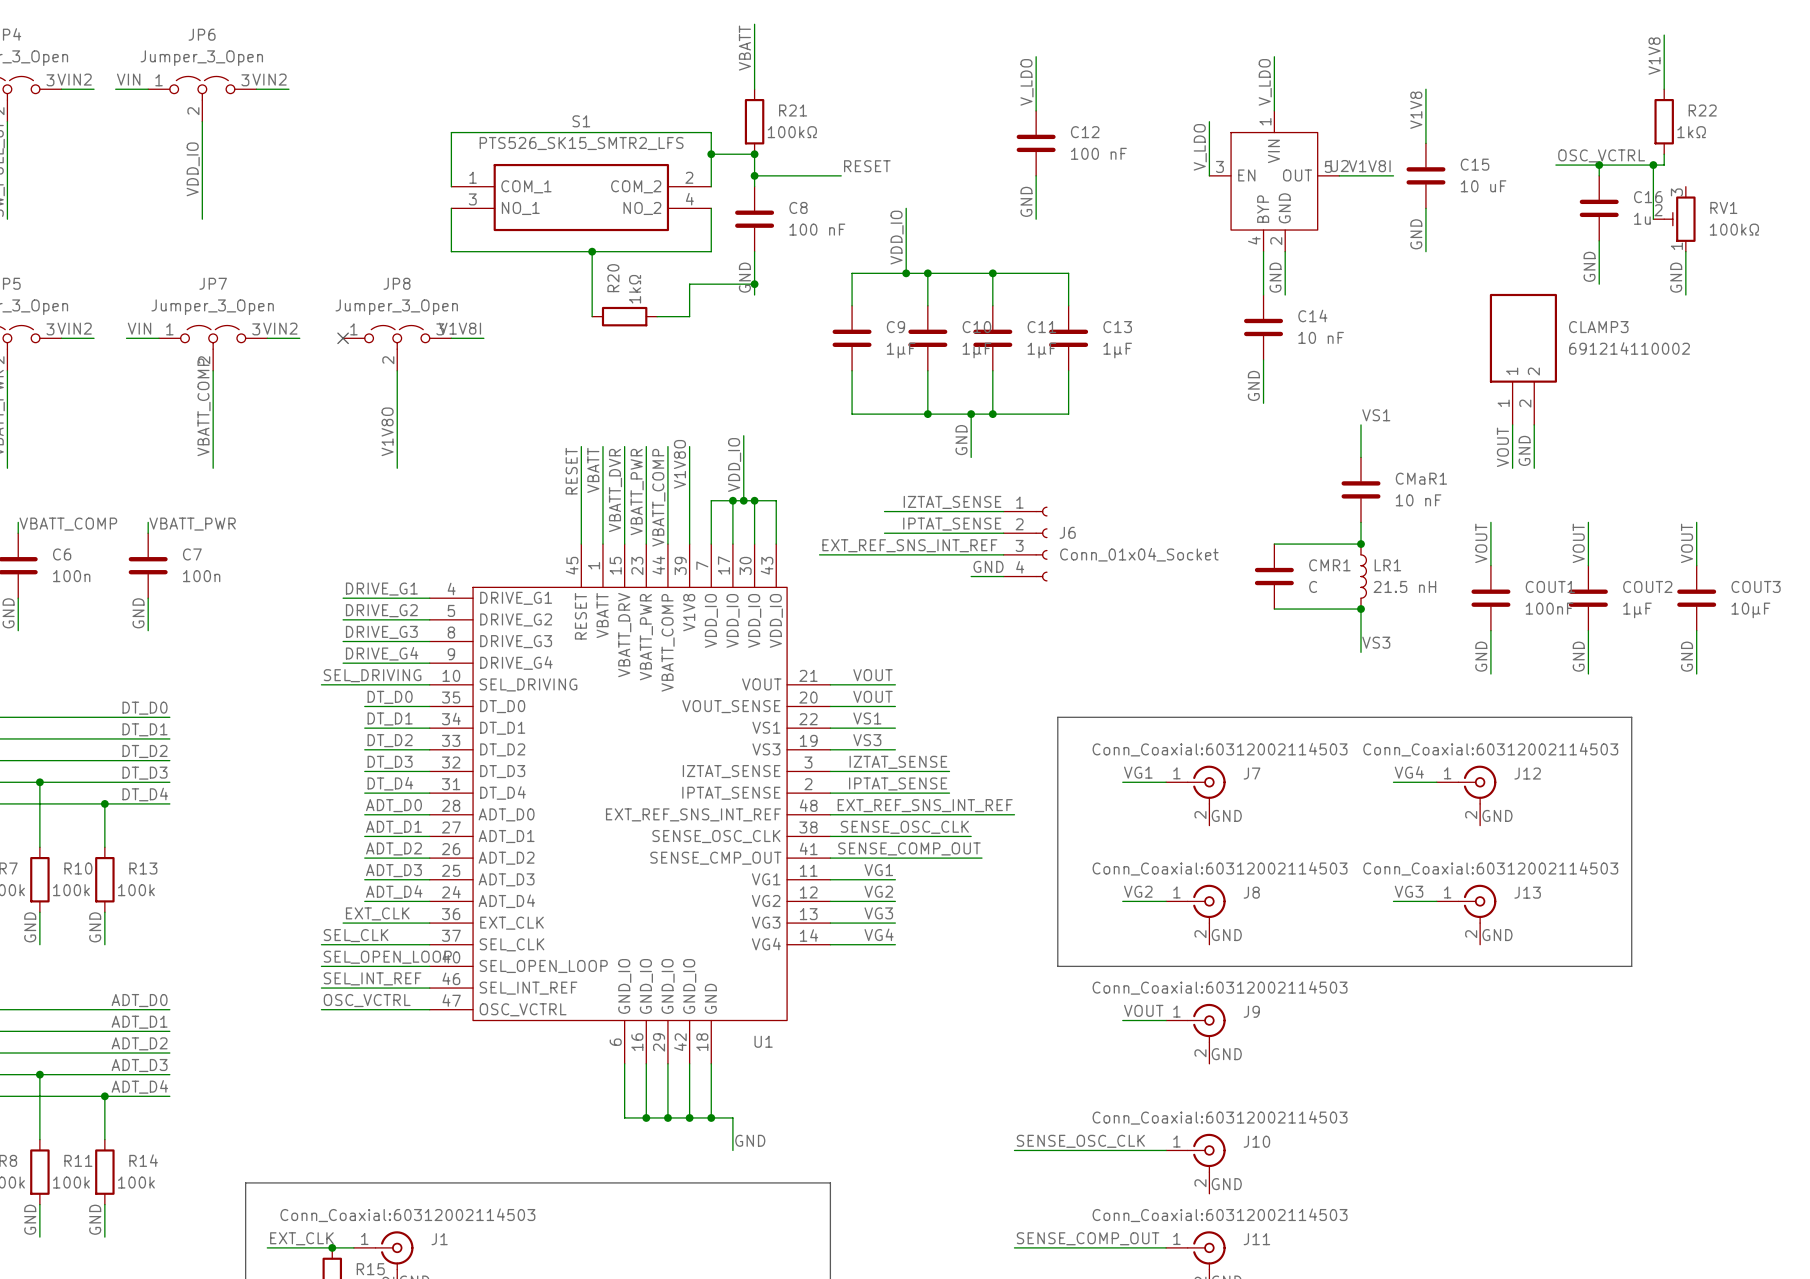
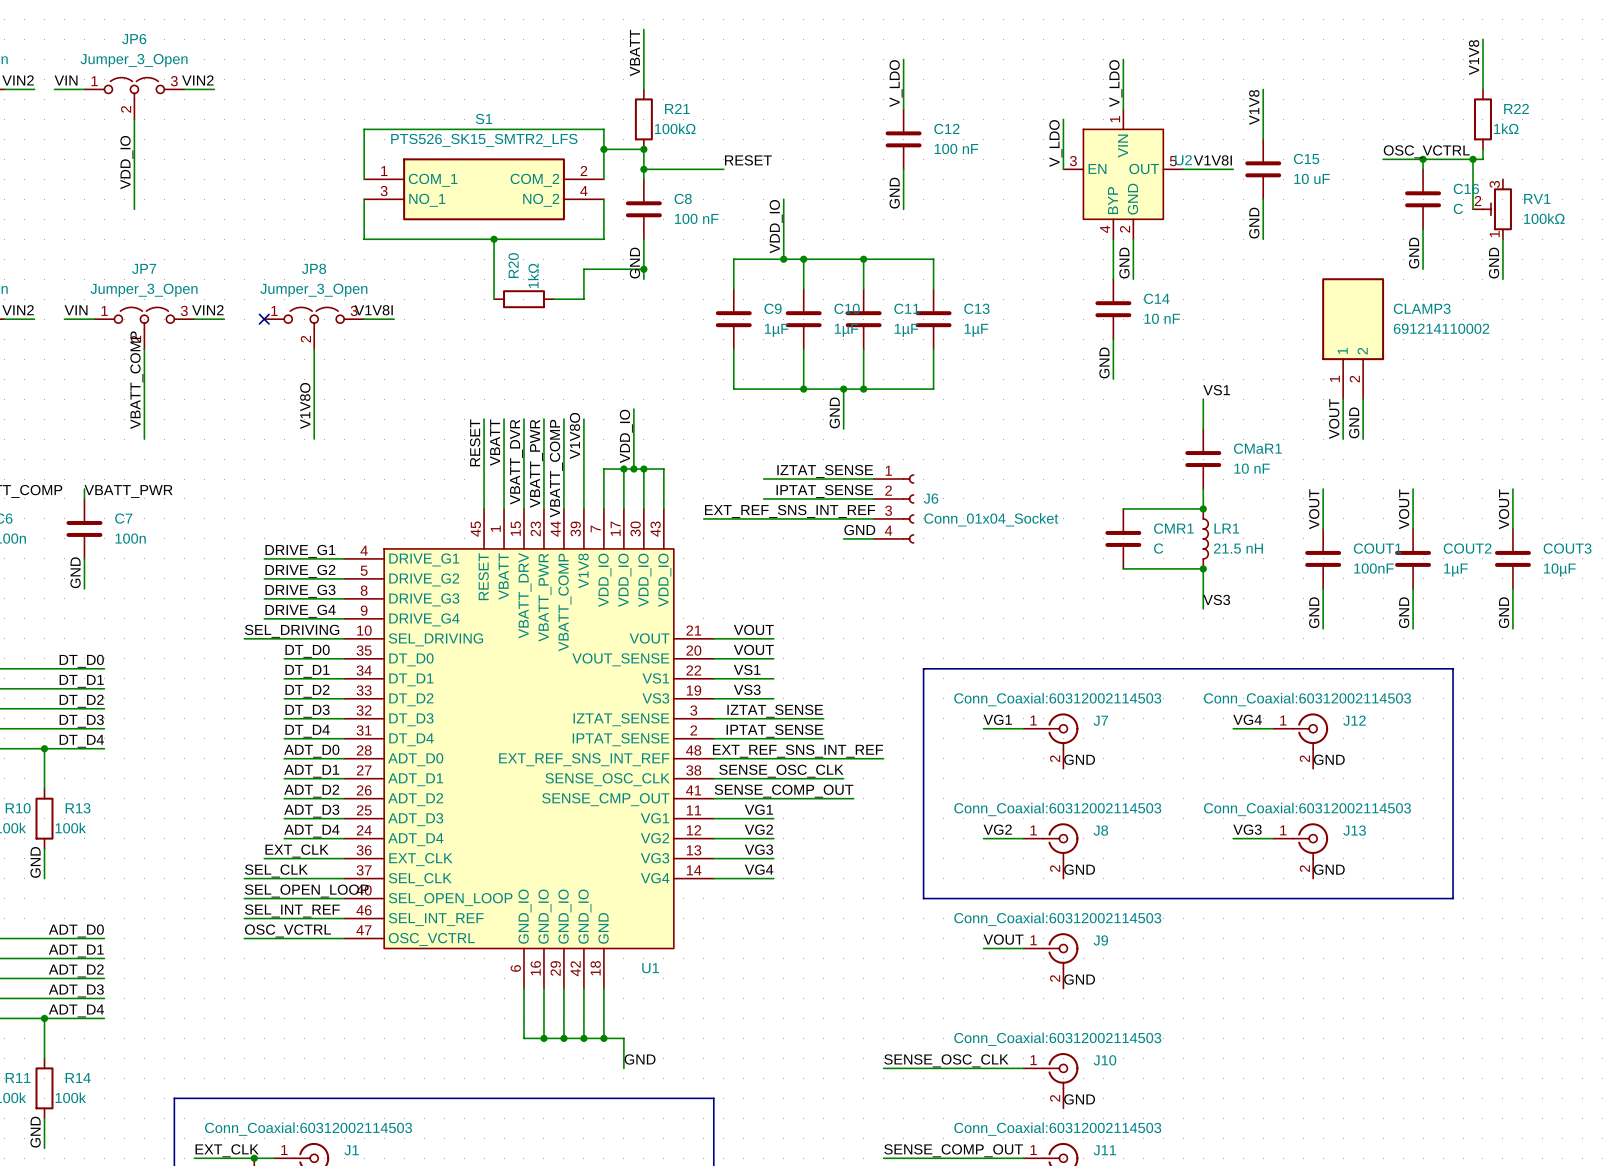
C16 value: 1u (1642, 218) -> C (1458, 208)

